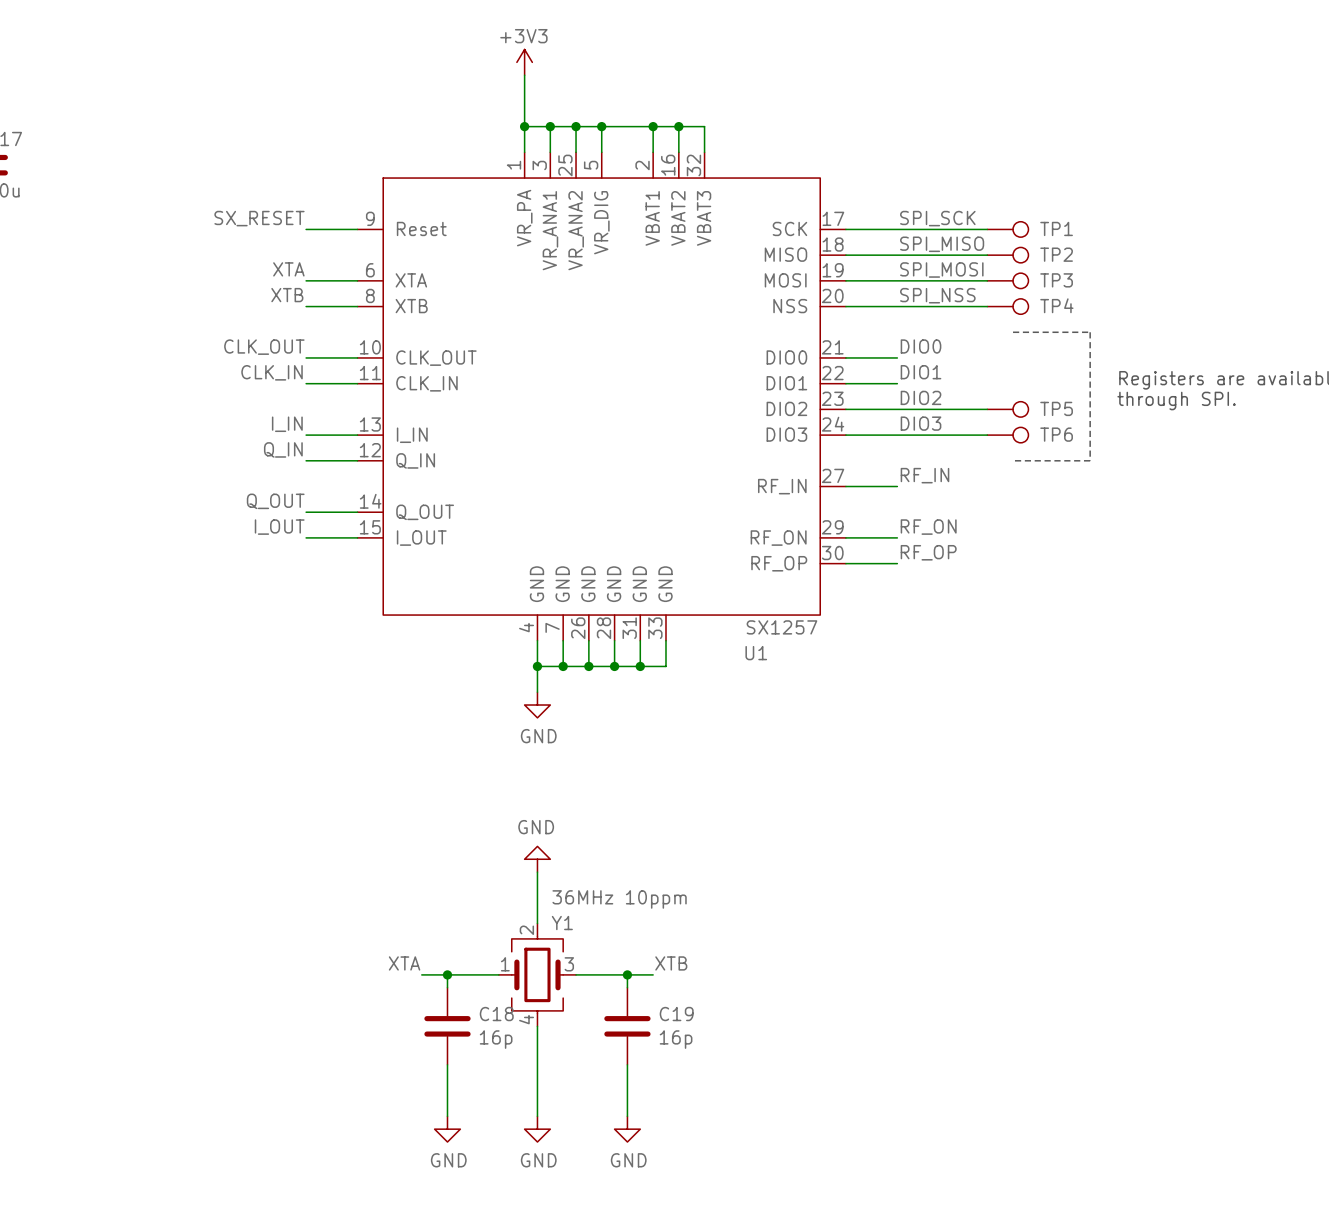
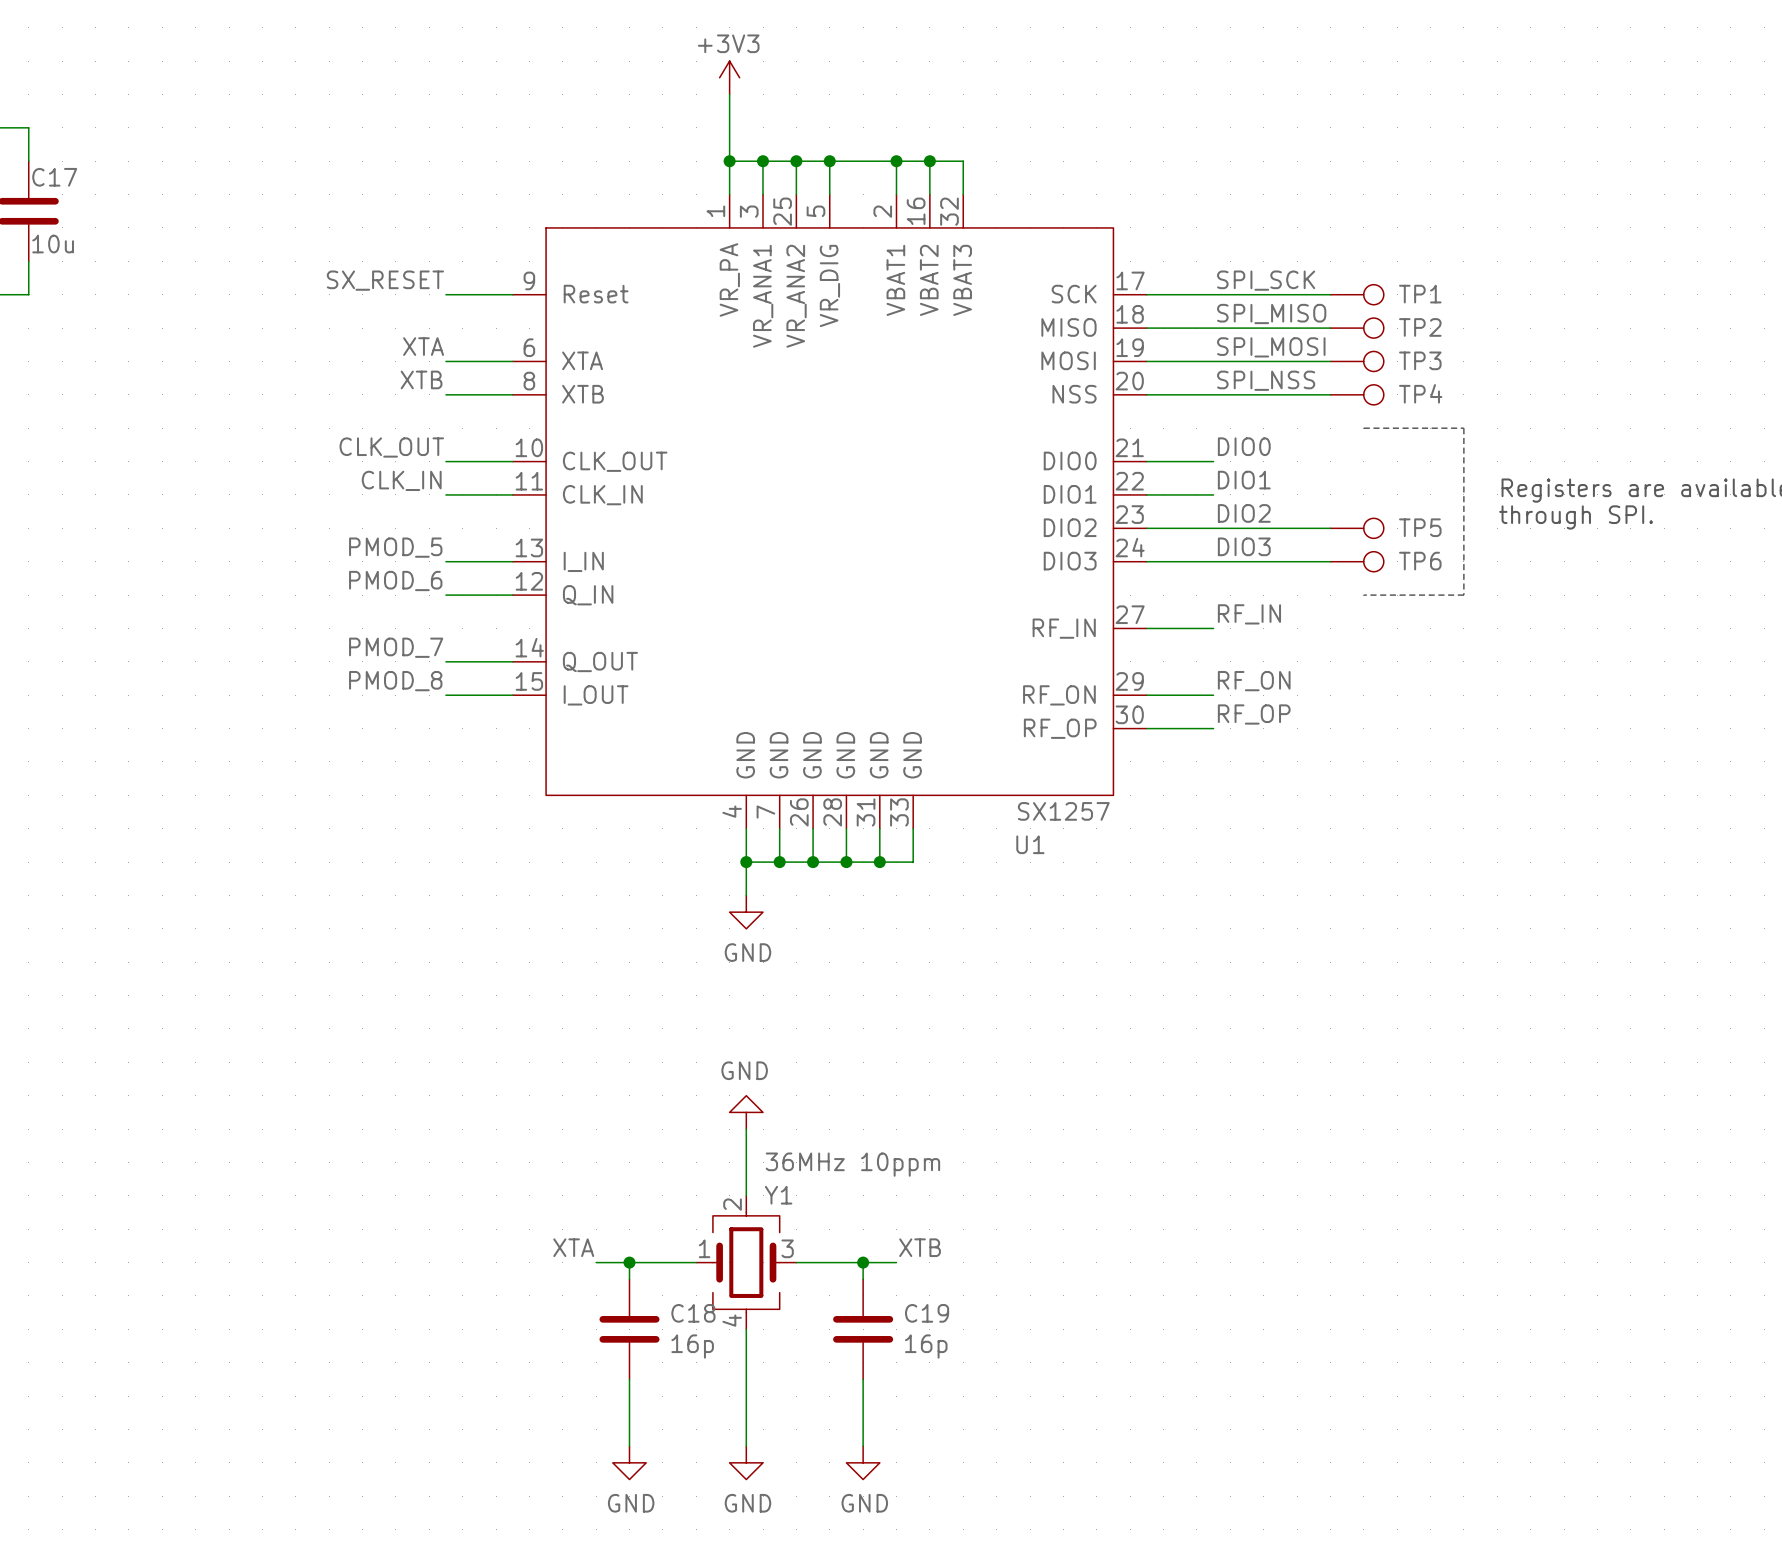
label: I_IN (287, 424) -> PMOD_5 (395, 547)
label: Q_IN (283, 449) -> PMOD_6 (395, 580)
label: Q_OUT (275, 501) -> PMOD_7 (396, 647)
label: I_OUT (279, 527) -> PMOD_8 (395, 681)

